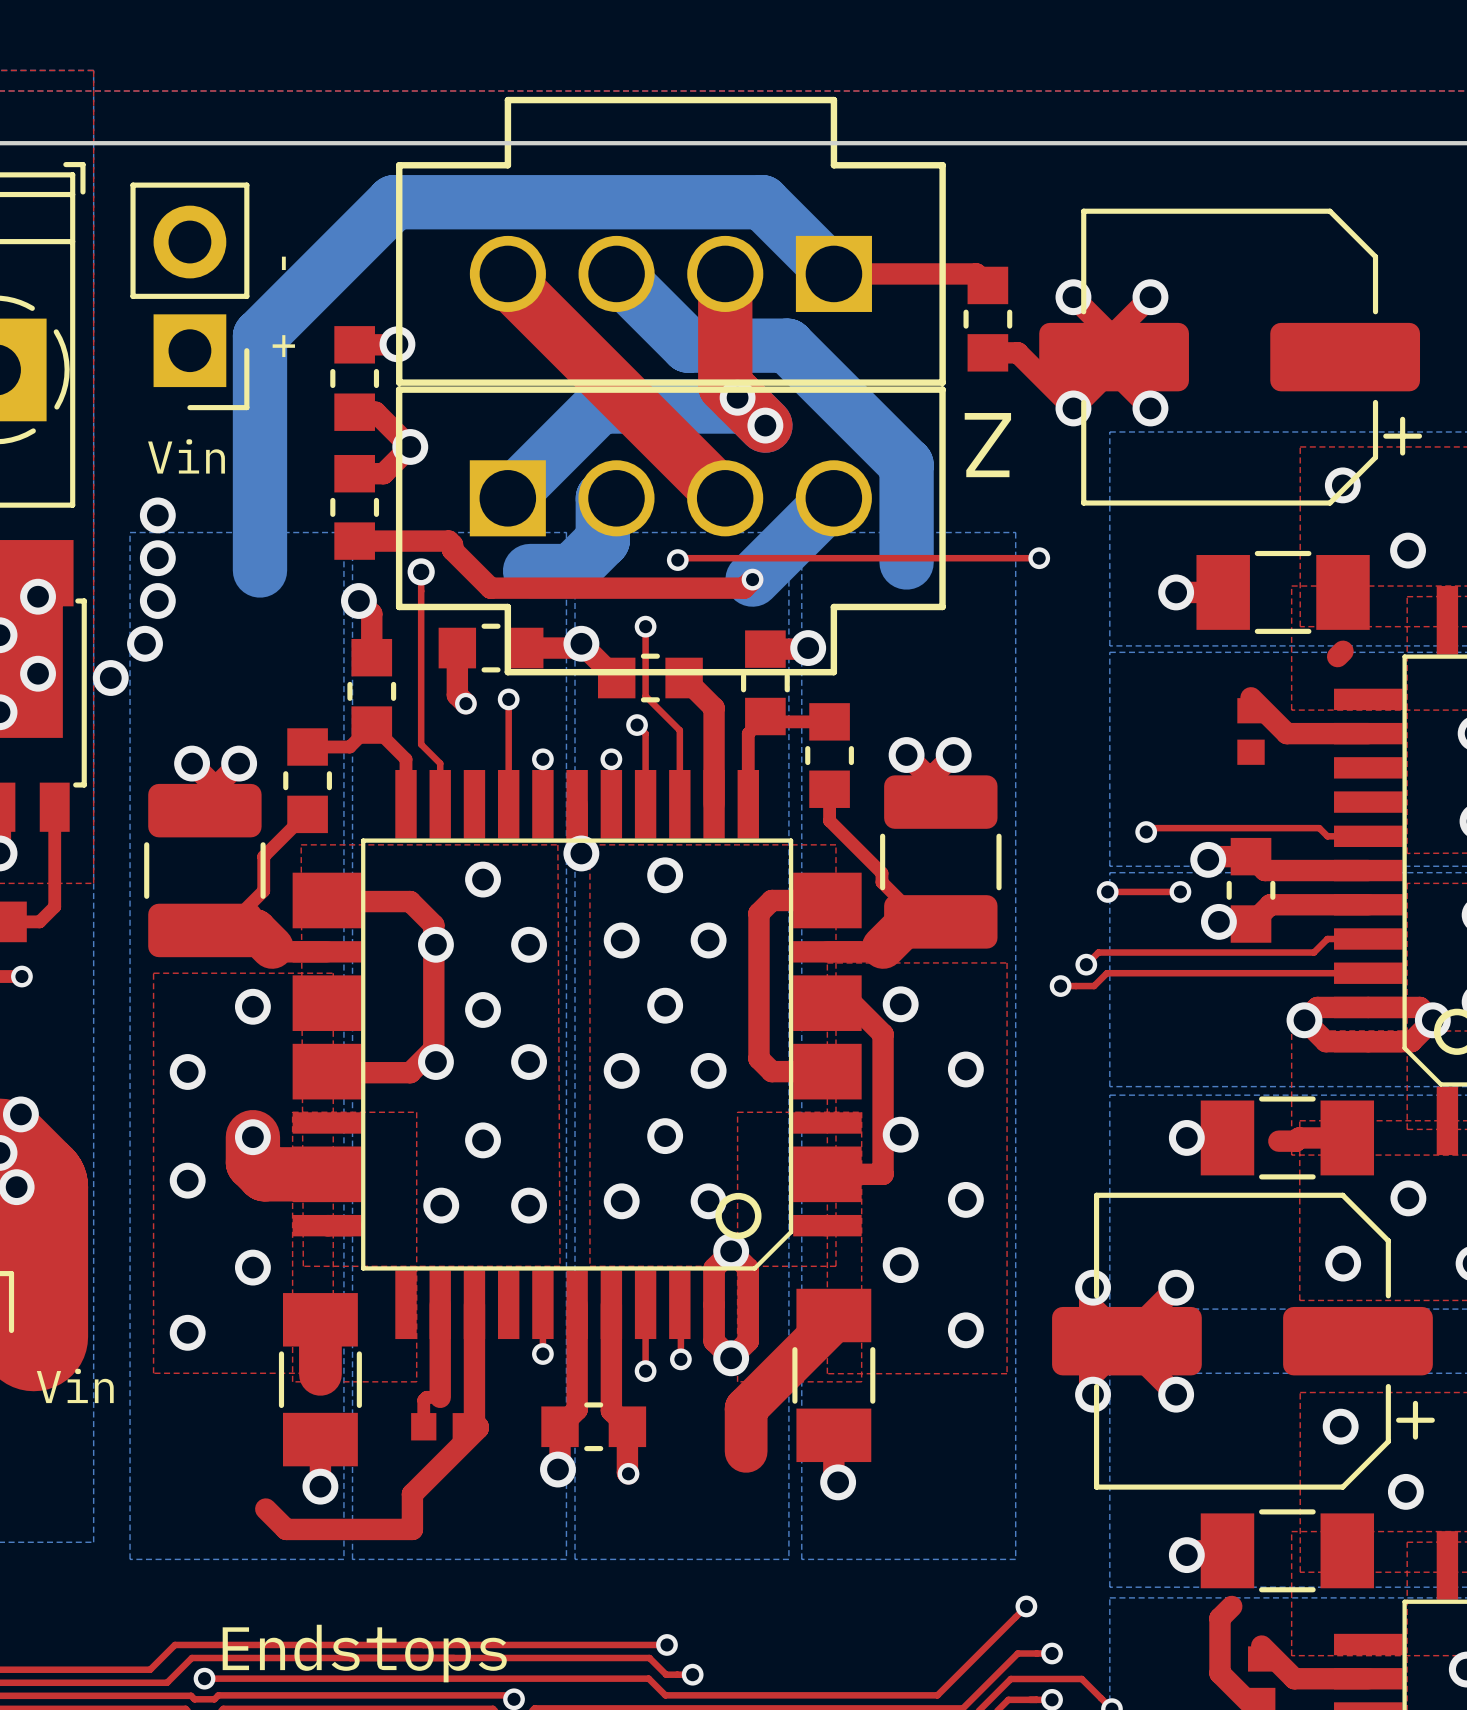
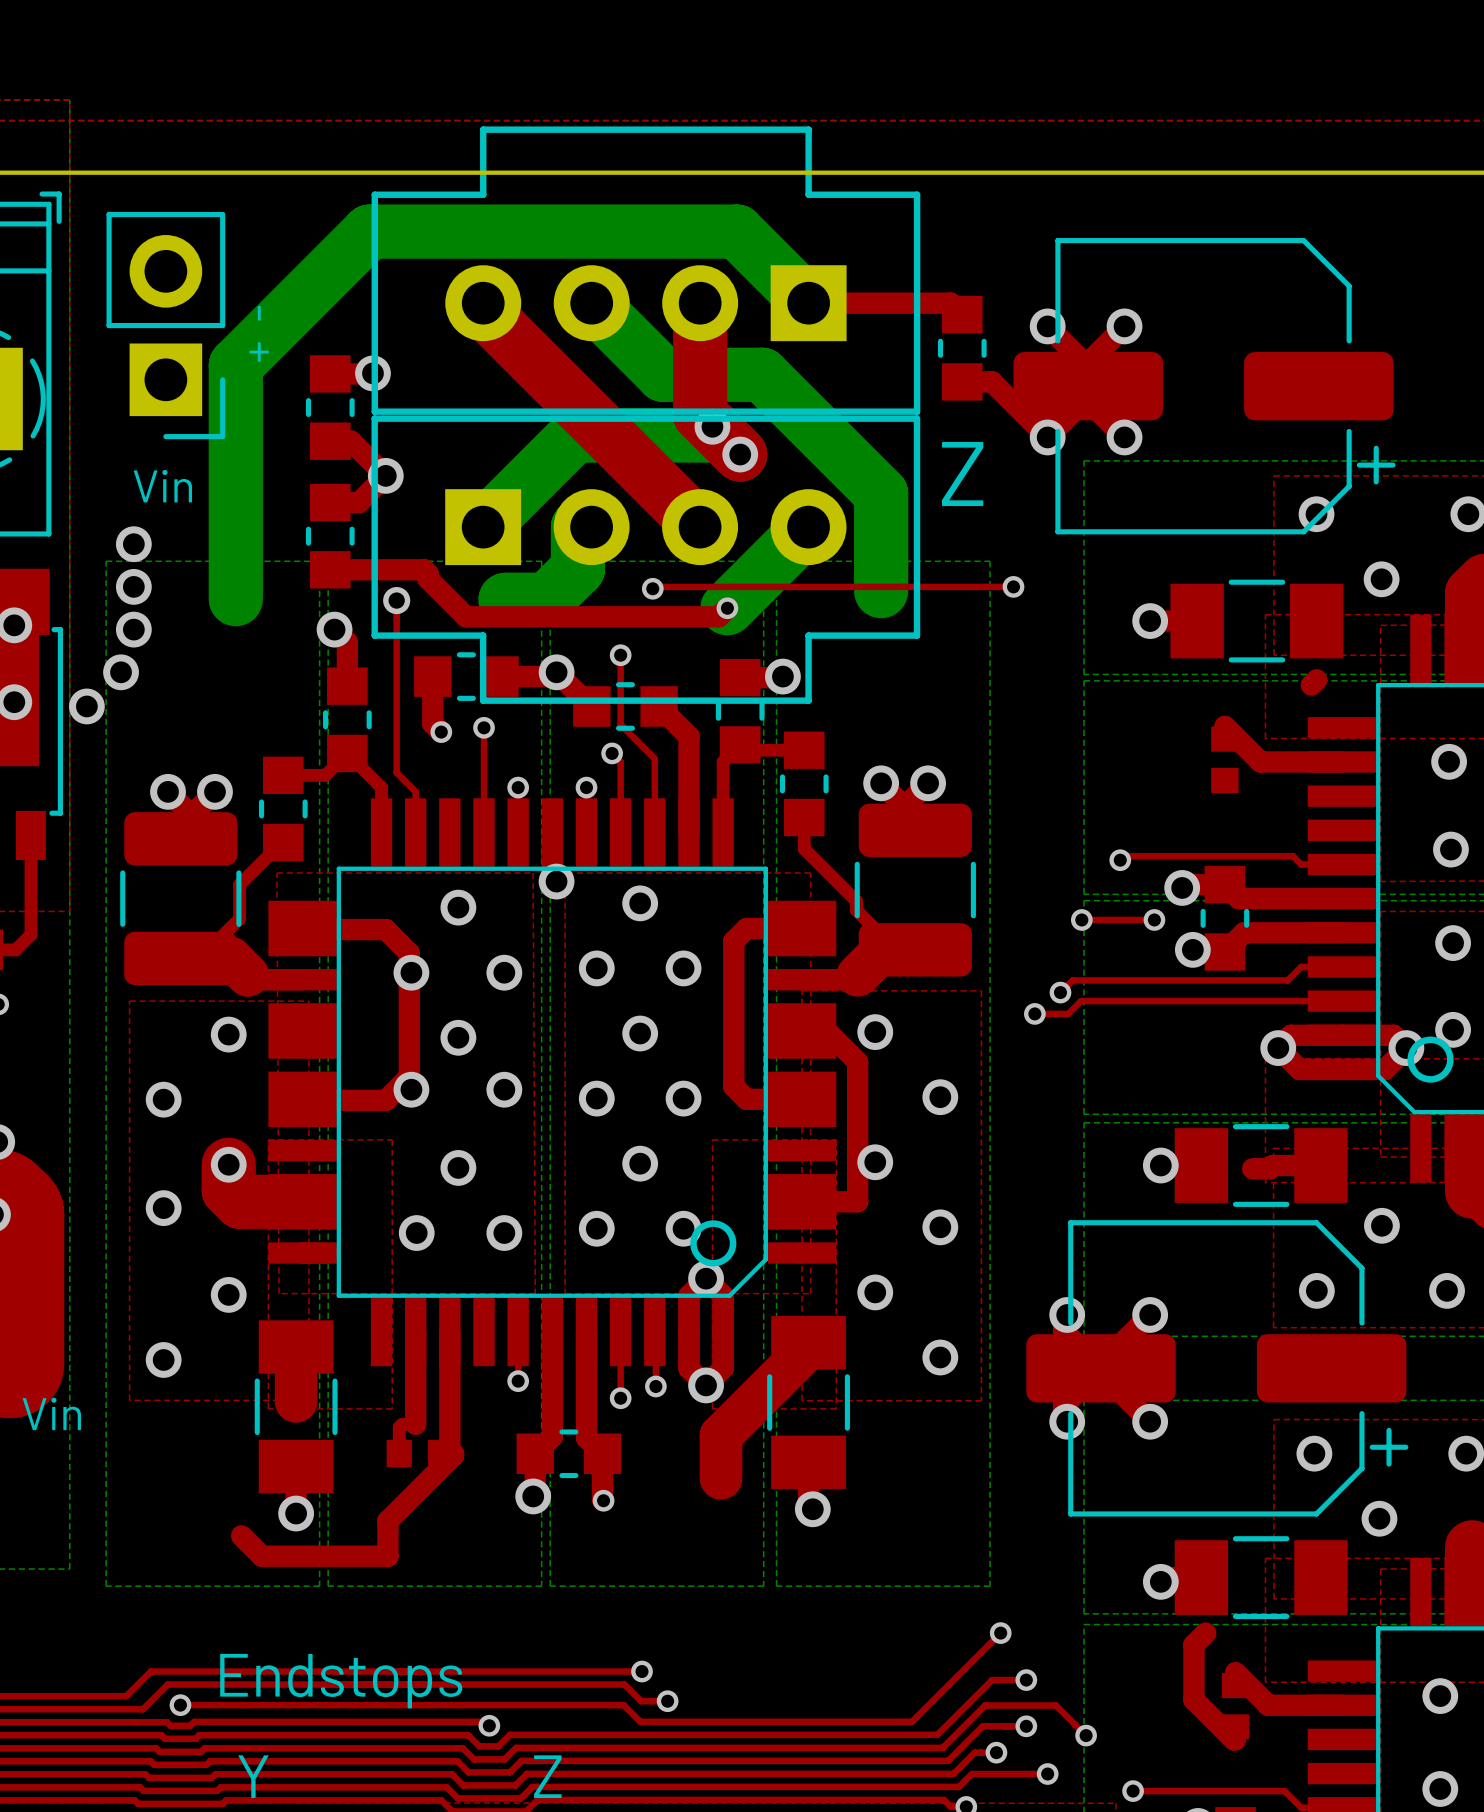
part footprint: [396, 96, 946, 386] -> [371, 126, 921, 415]
part footprint: [395, 386, 946, 676] -> [371, 415, 921, 704]

